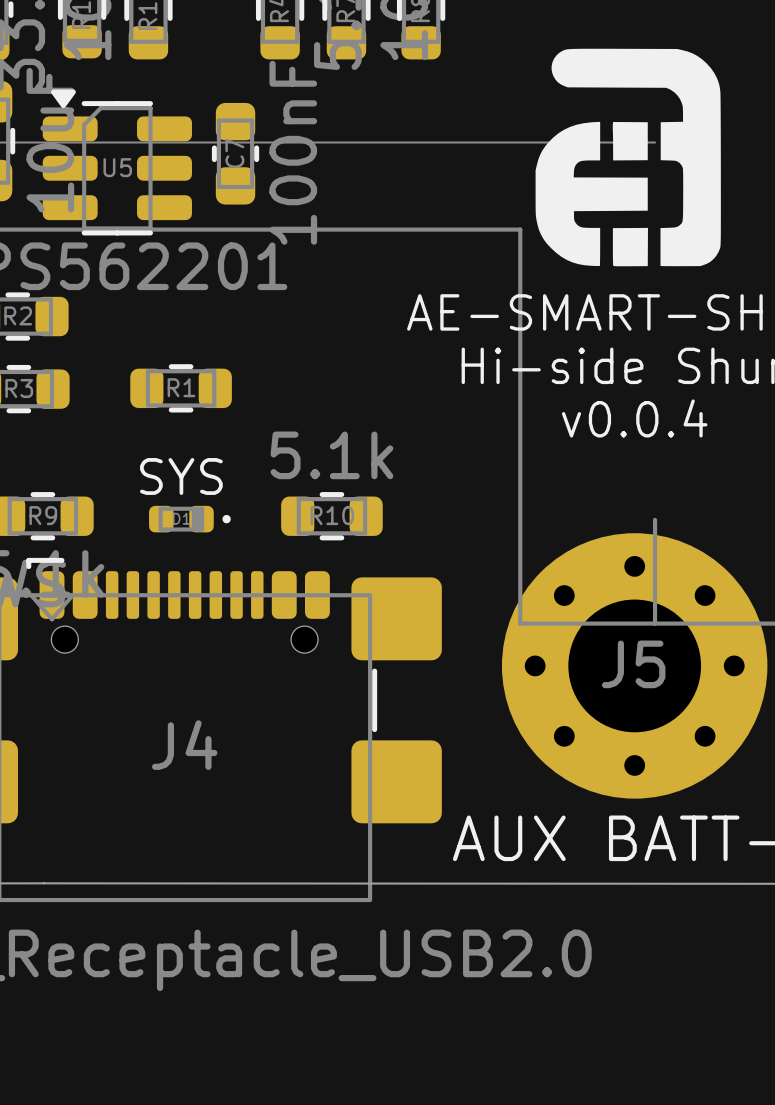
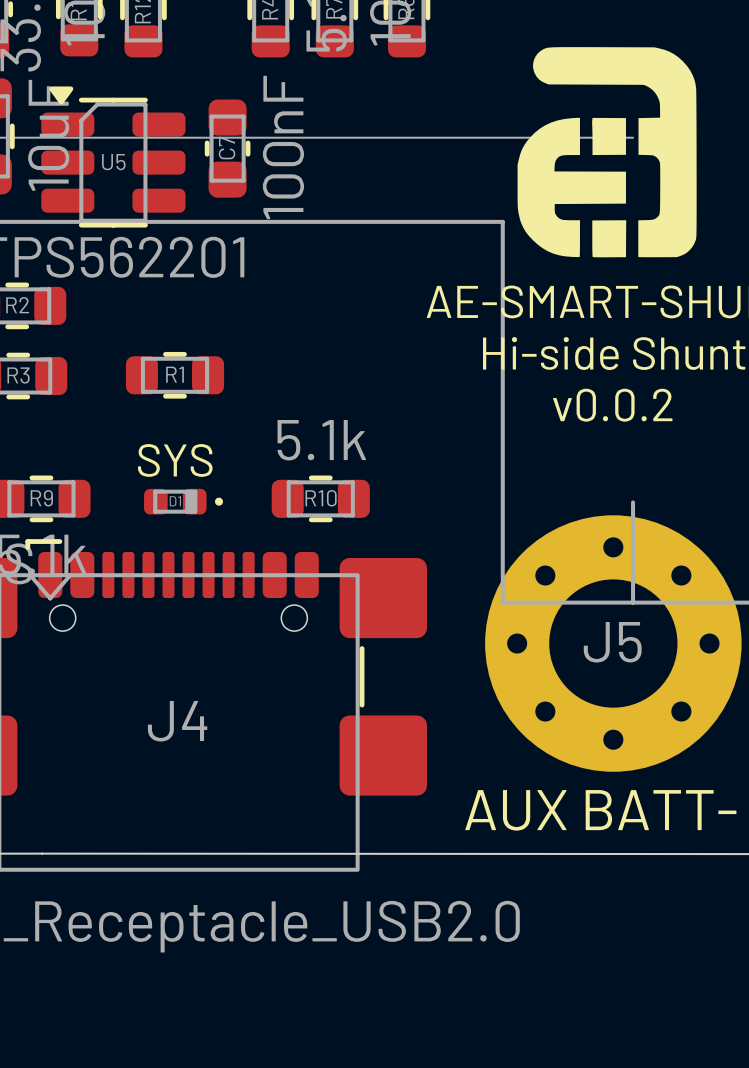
text: v0.0.4 (634, 418) -> v0.0.2 (612, 405)

